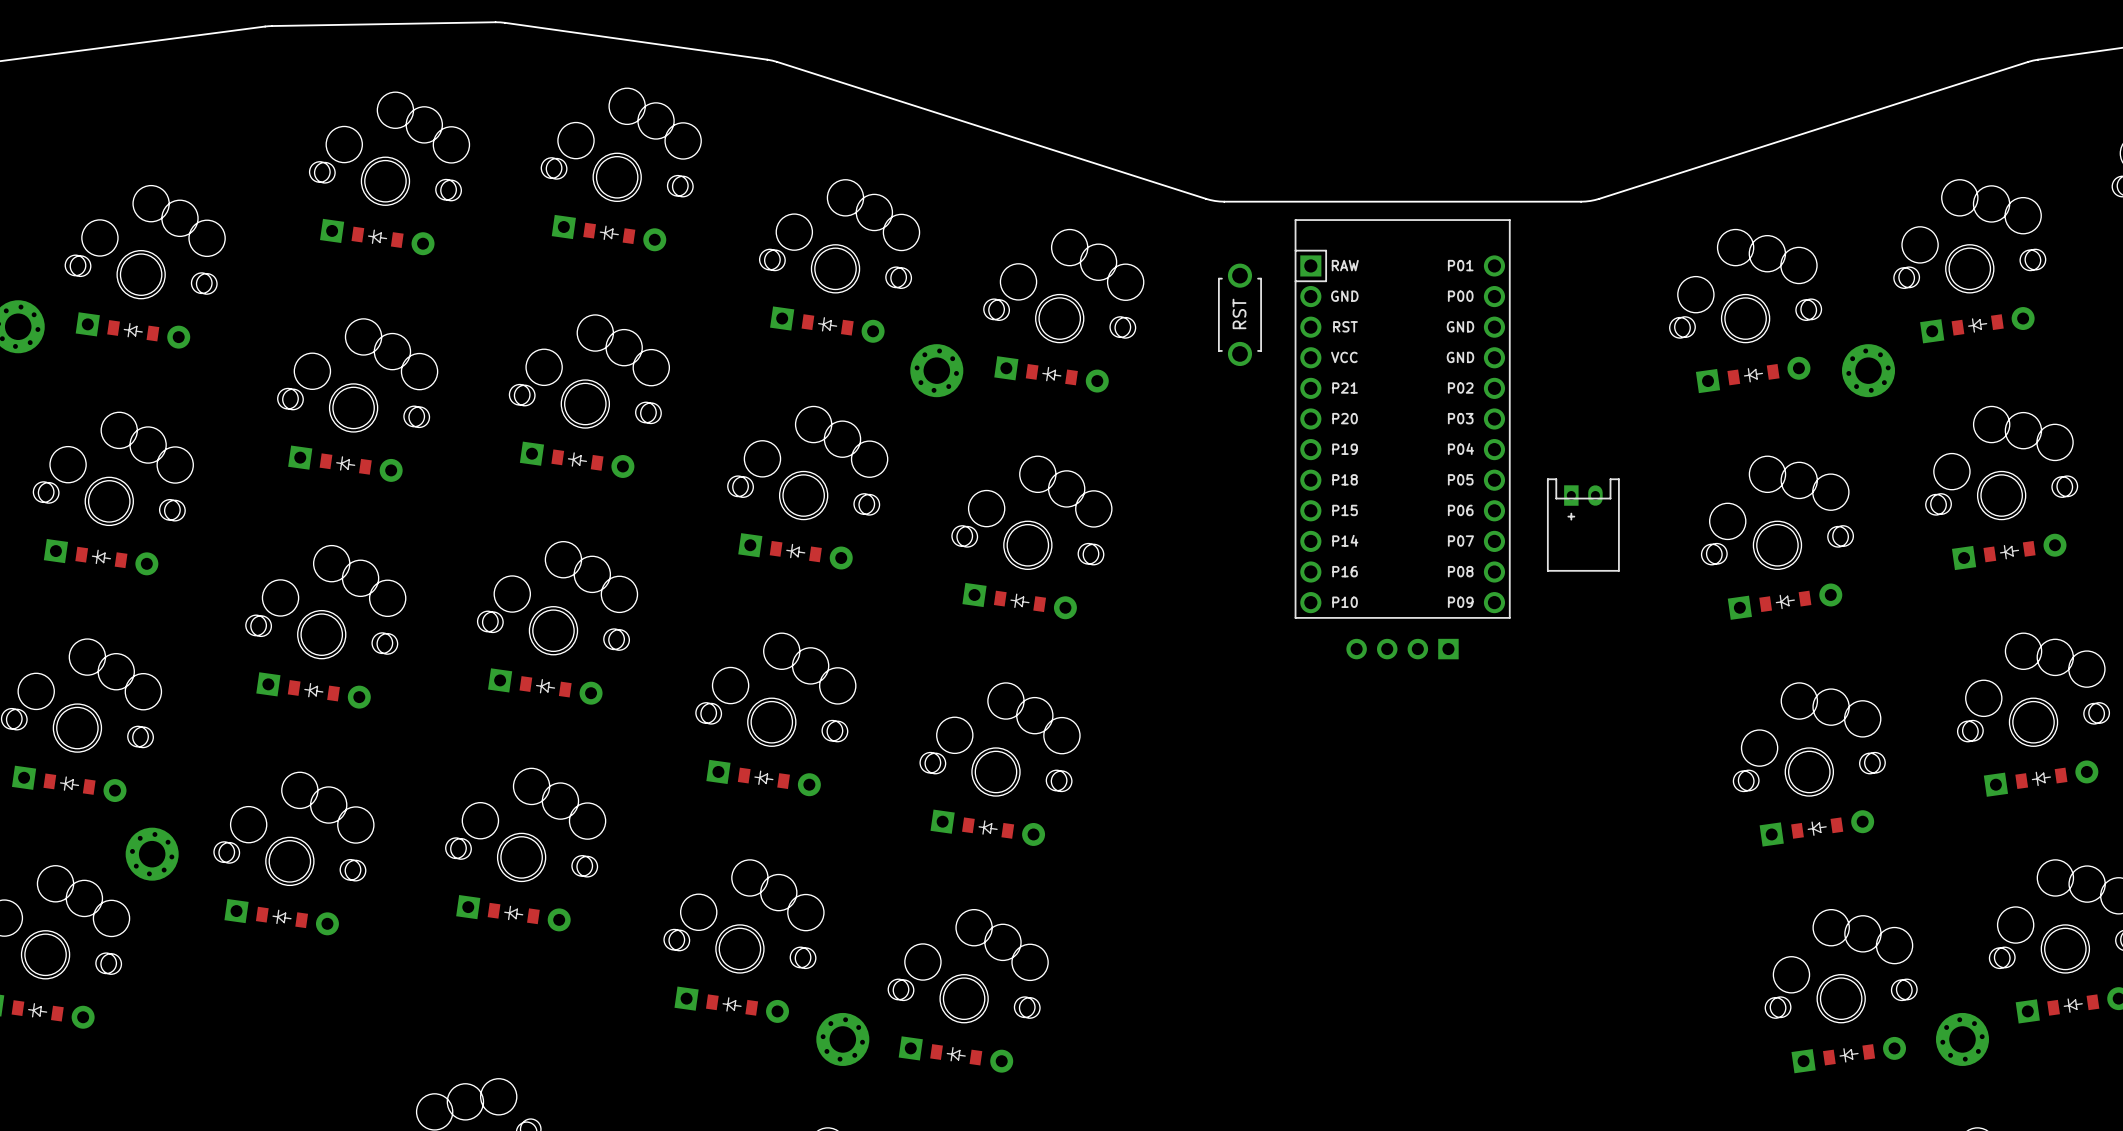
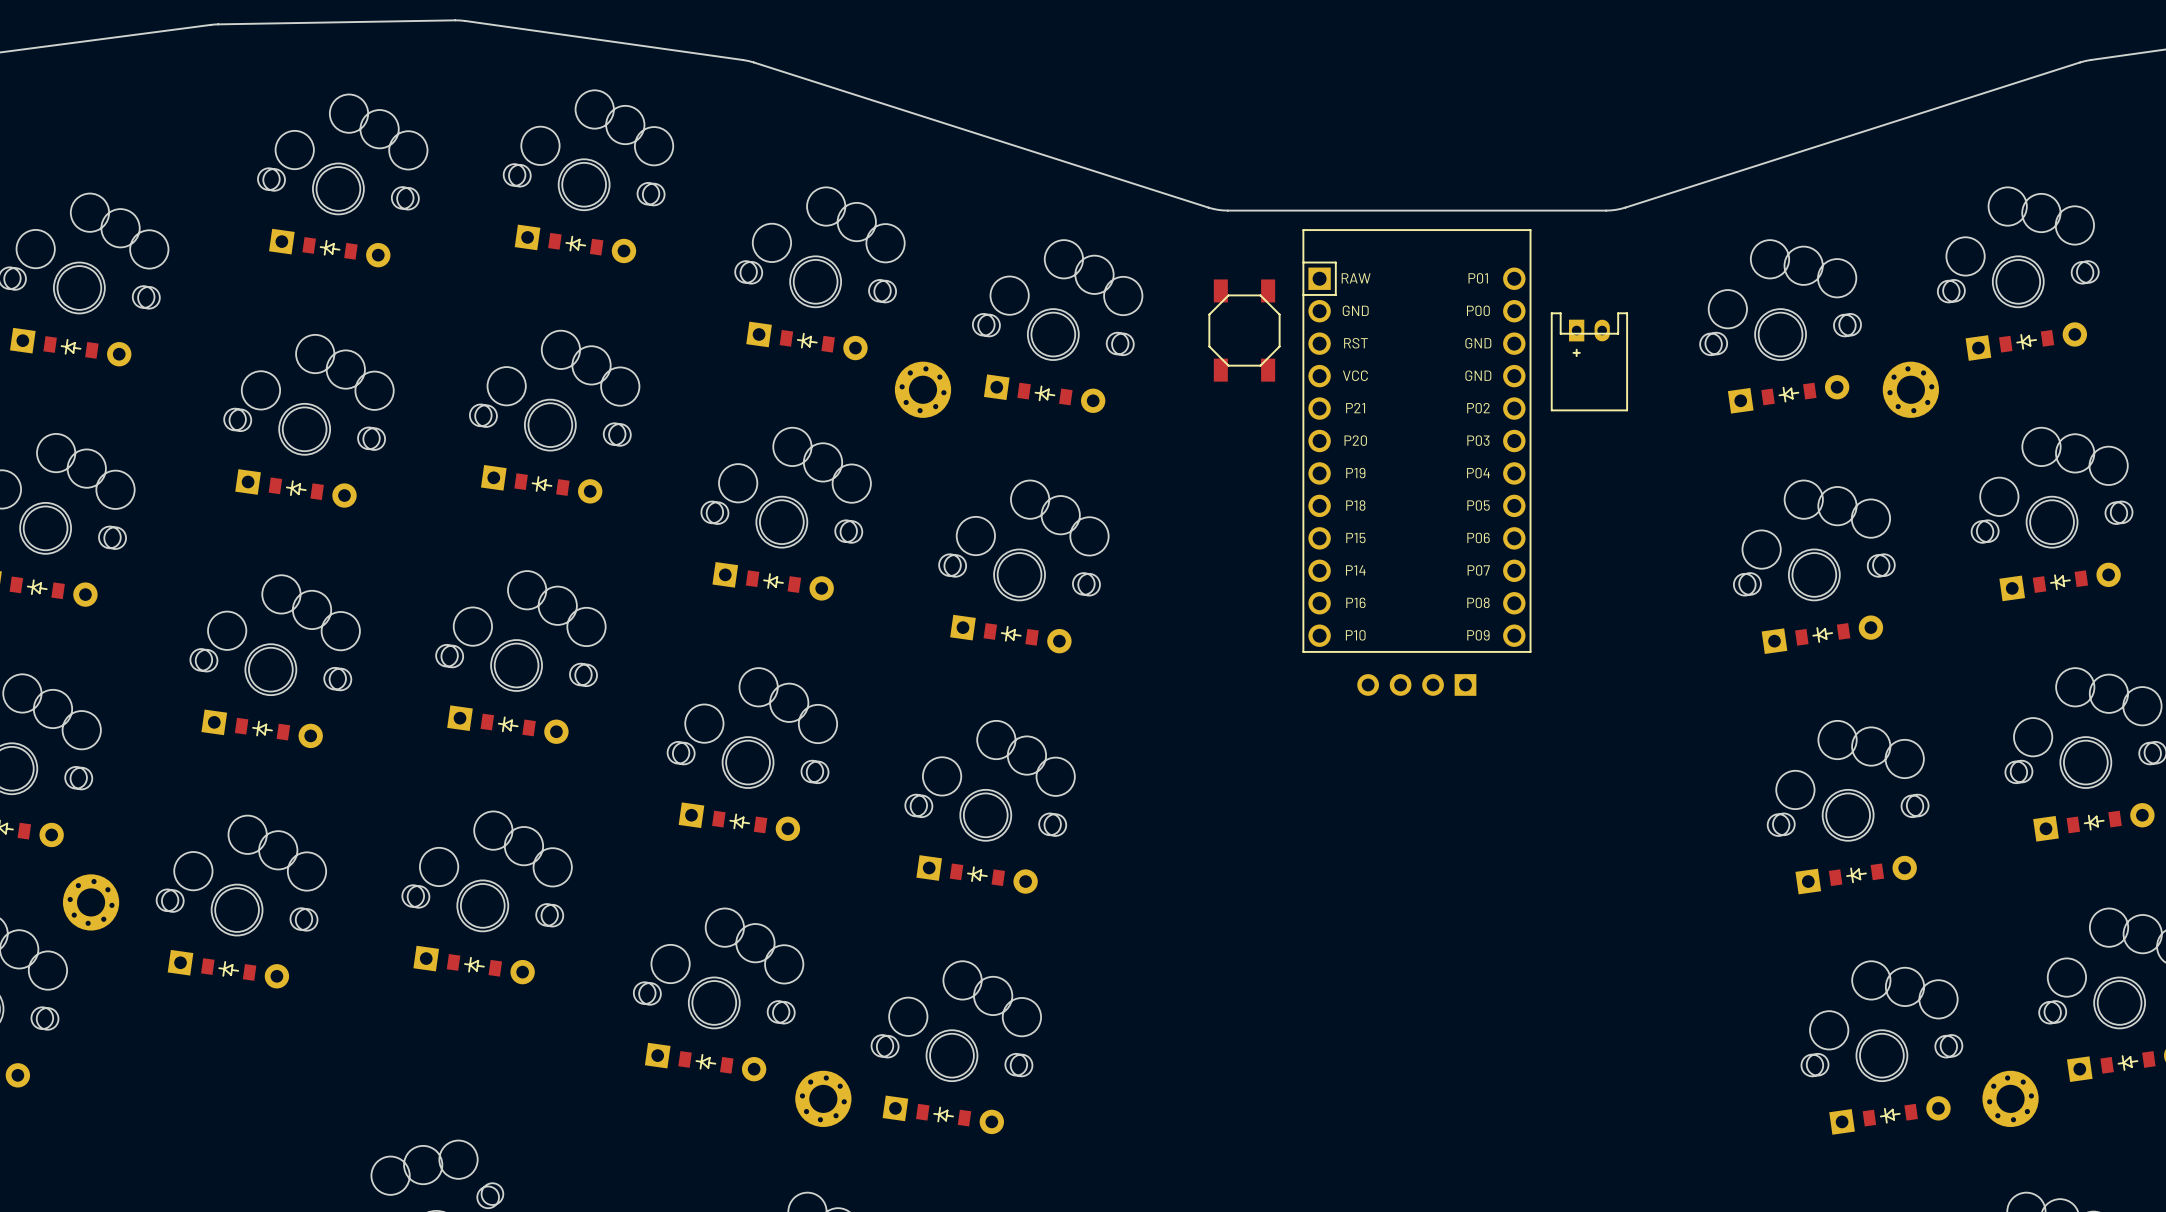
part footprint: [1218, 263, 1262, 367] -> [1208, 279, 1281, 382]
part position: (1583, 525) -> (1589, 361)

